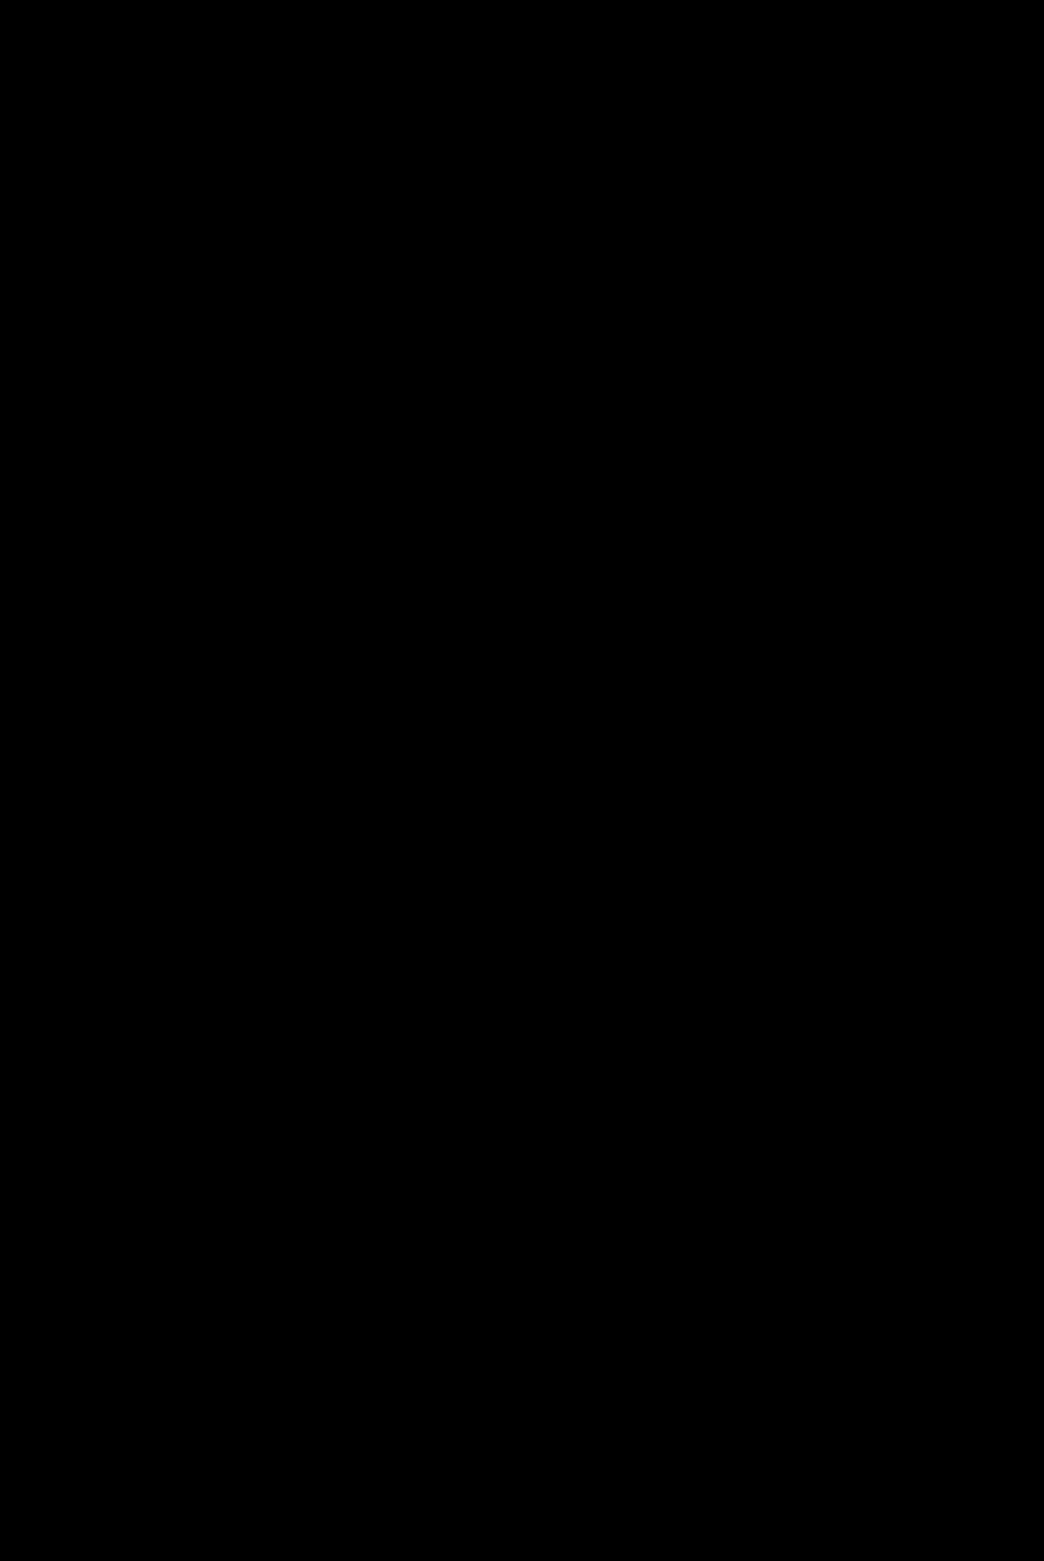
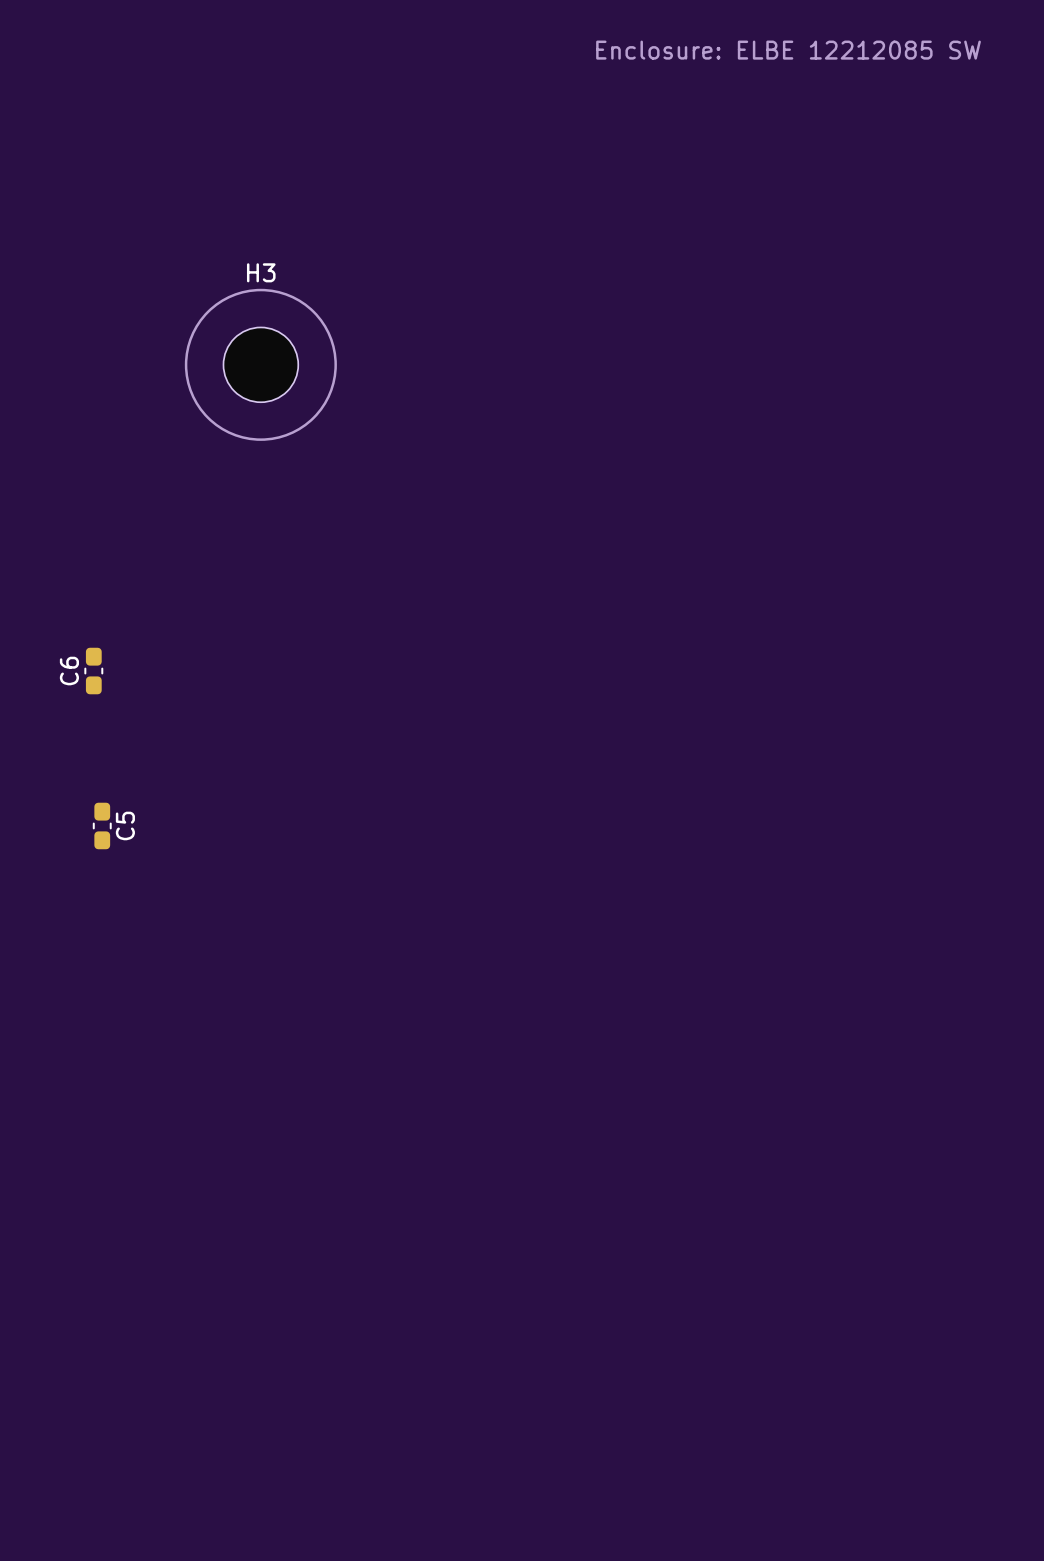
text: none -> Enclosure: ELBE 12212085 SW (788, 50)
H3: none -> (260, 364)
C6: none -> (93, 671)
C5: none -> (102, 825)

